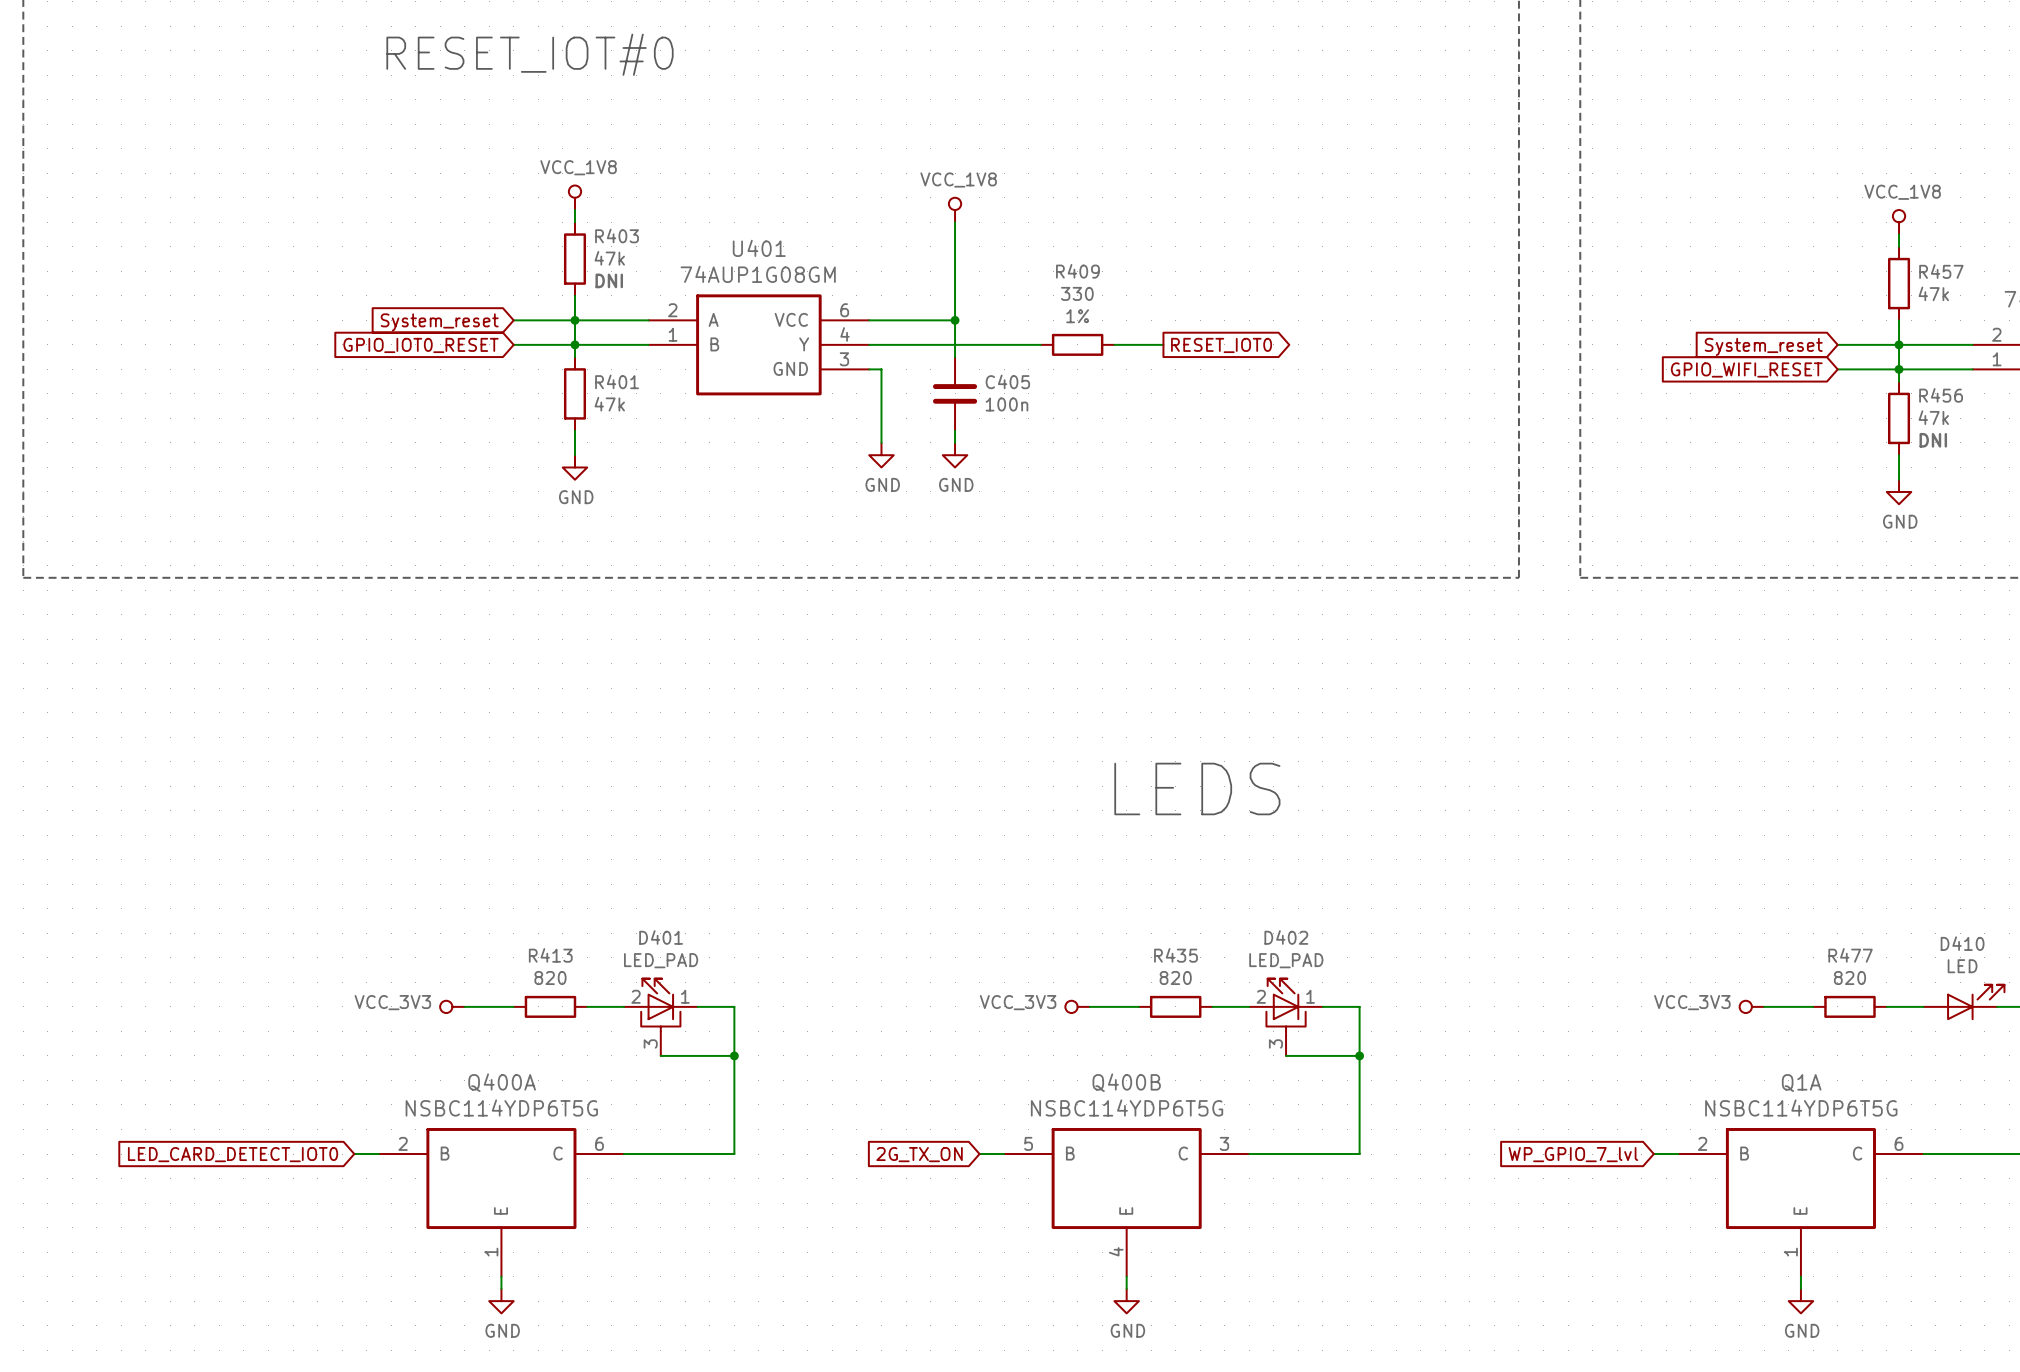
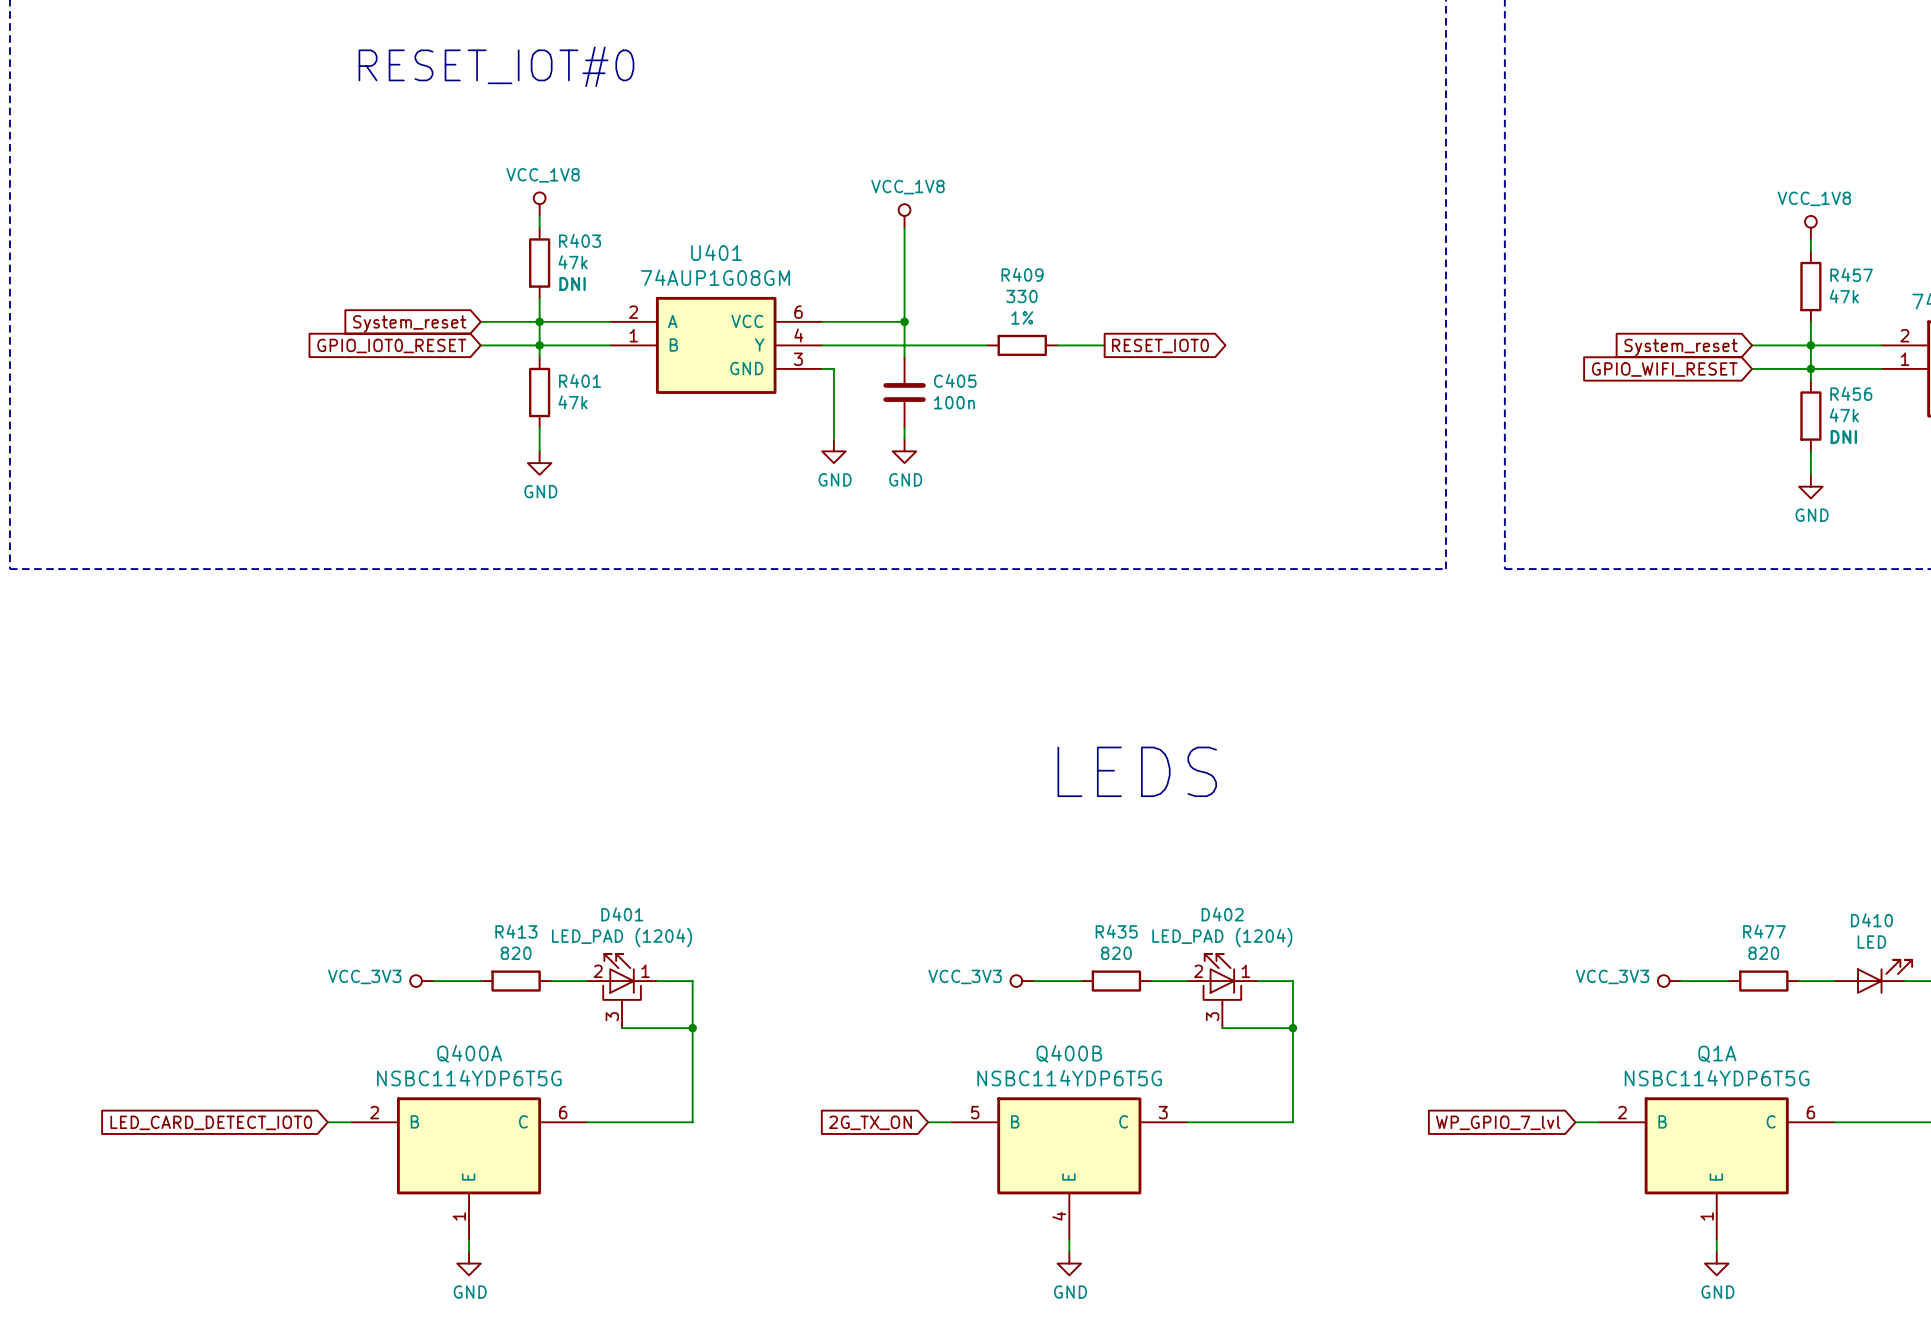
D401 value: LED_PAD (661, 960) -> LED_PAD (1204) (622, 937)
D402 value: LED_PAD (1286, 960) -> LED_PAD (1204) (1222, 937)

